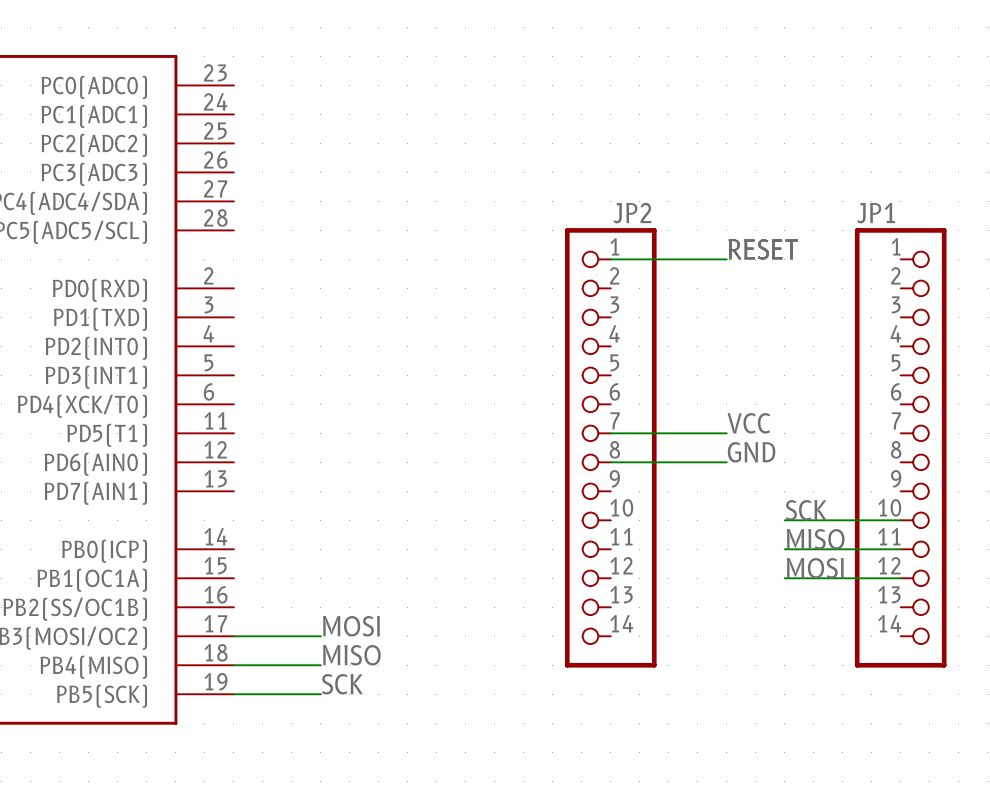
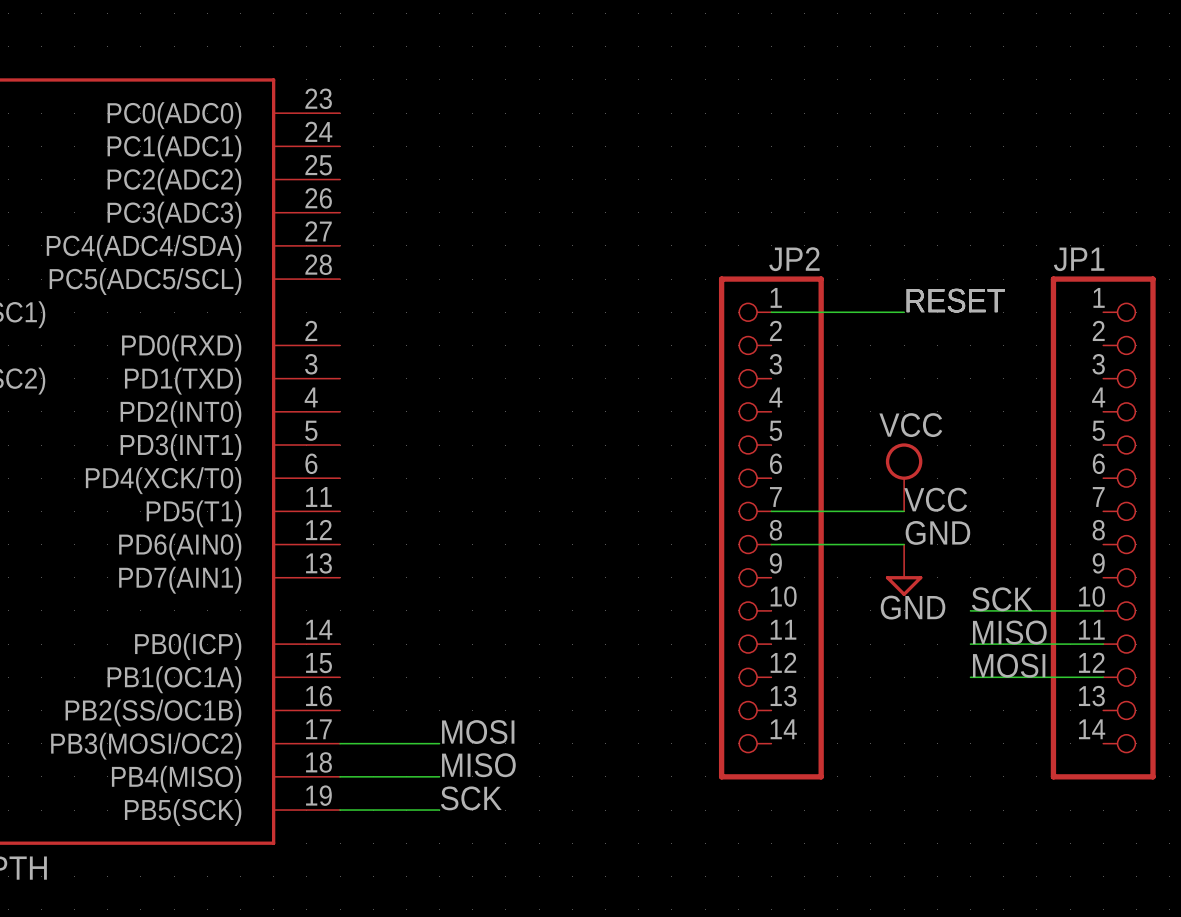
power symbol: none -> VCC (904, 477)
power symbol: none -> GND (904, 570)

